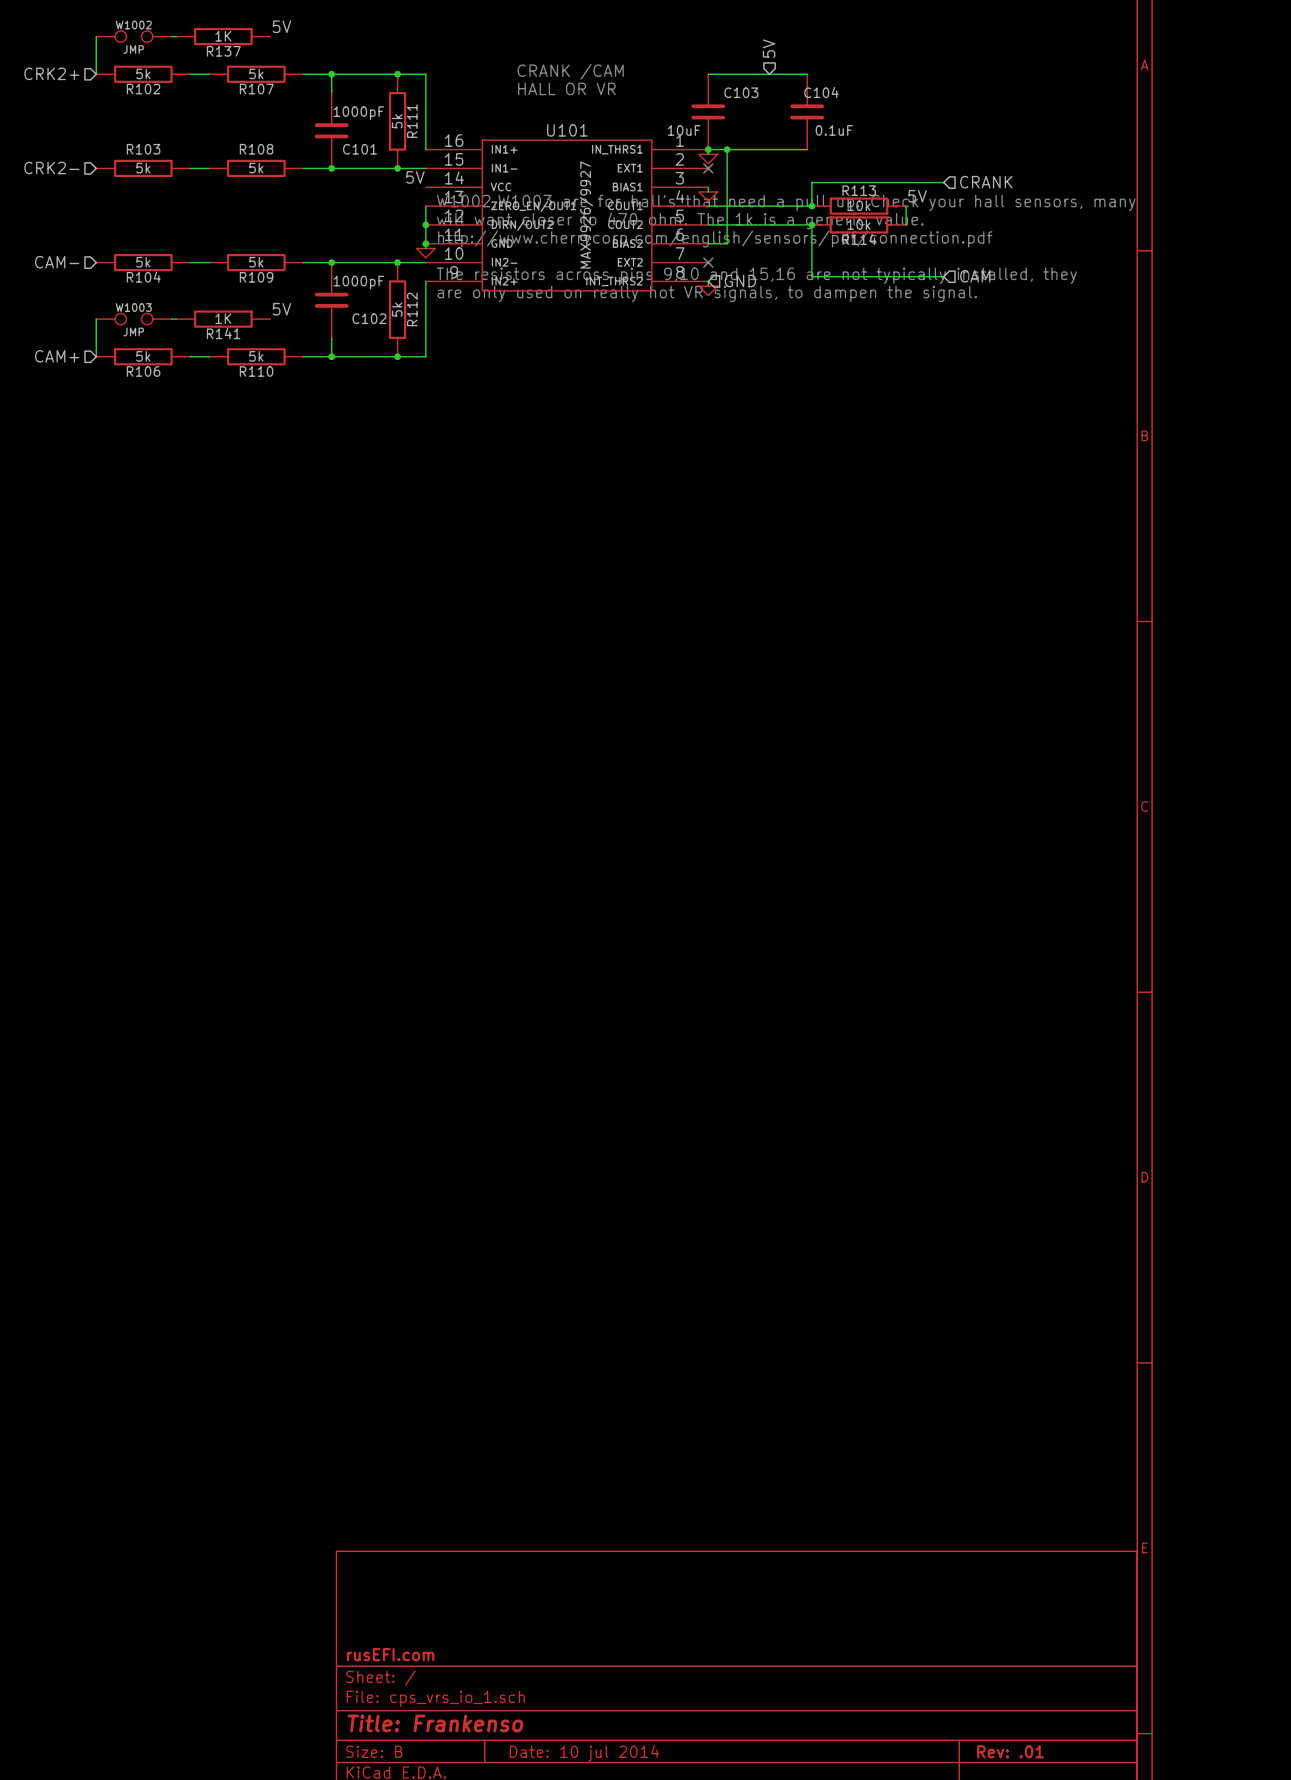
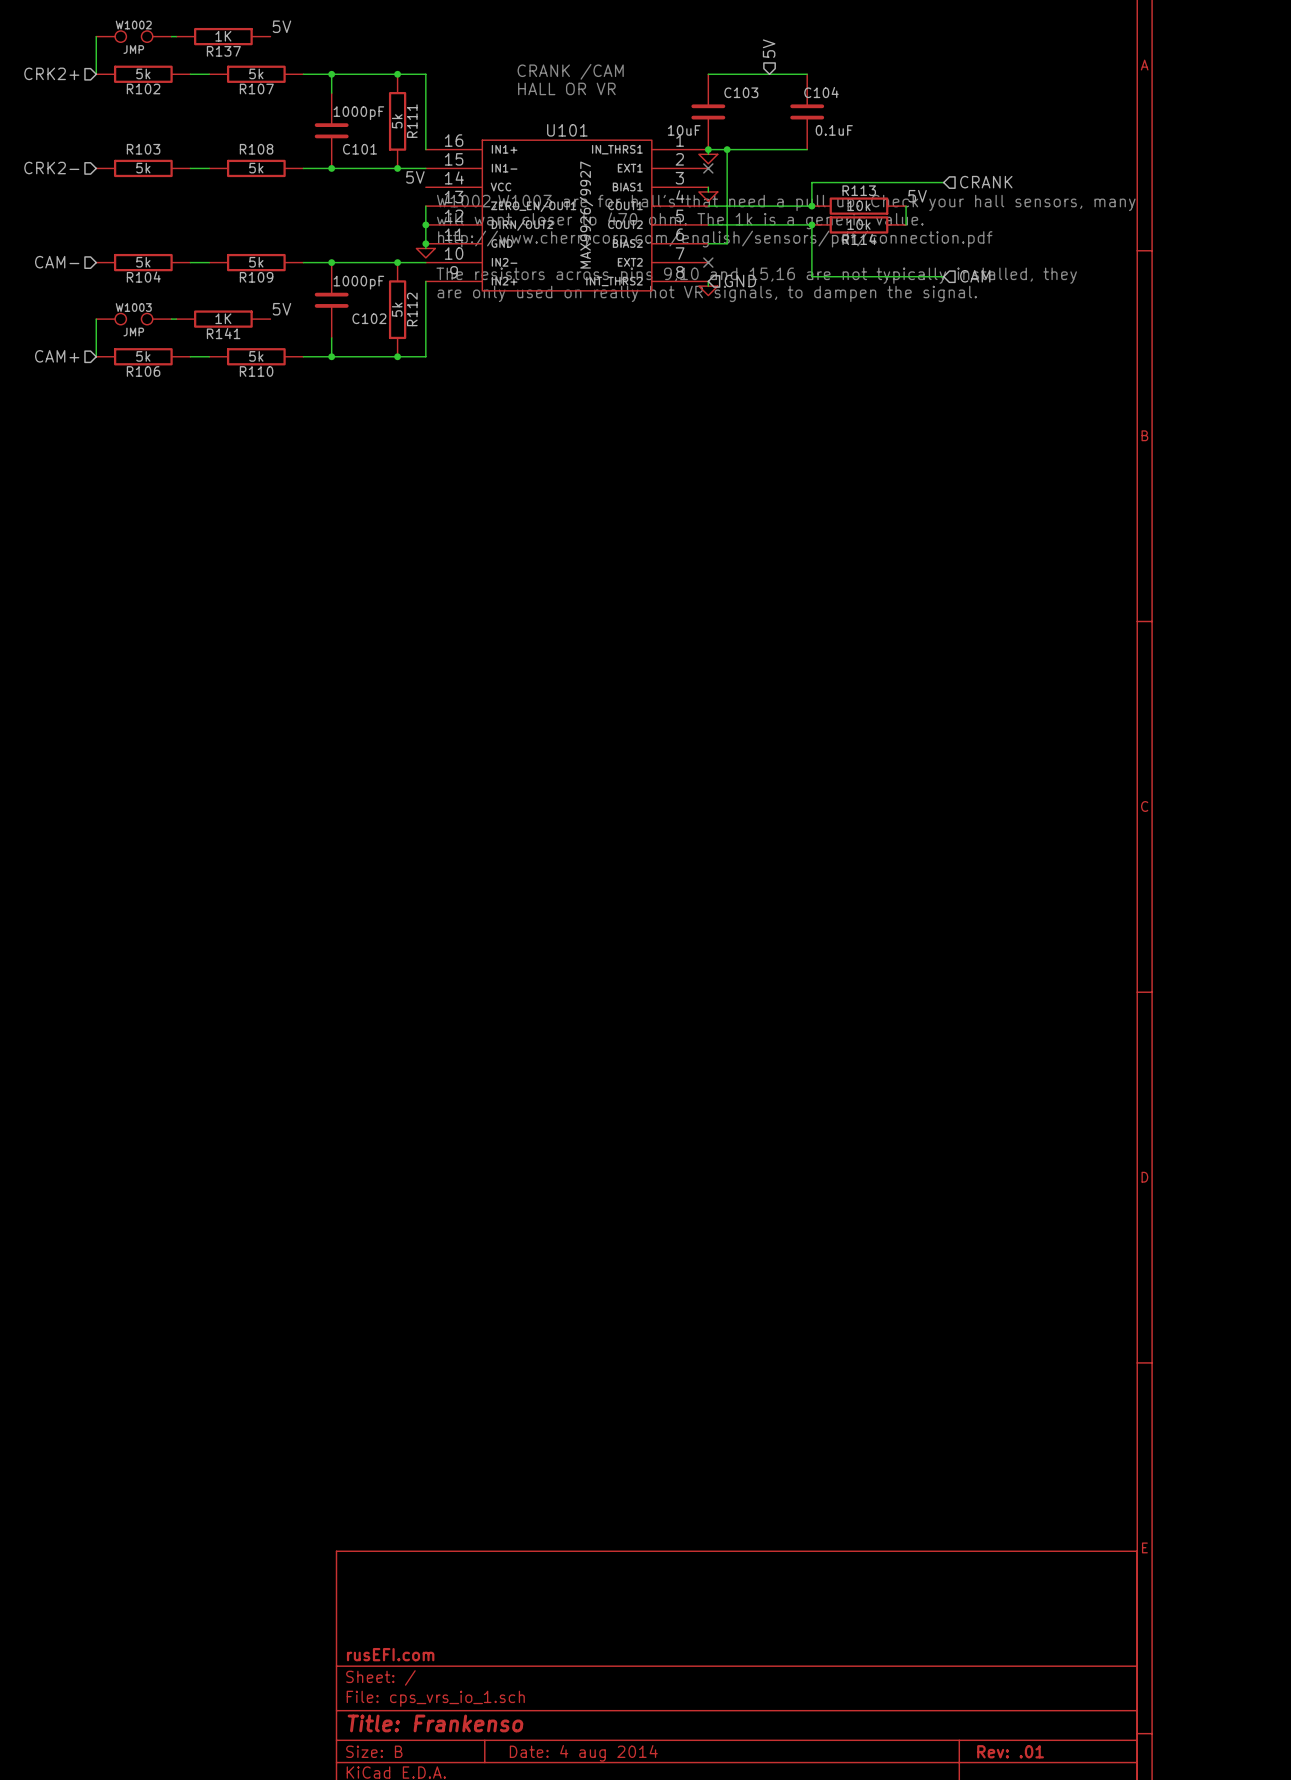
title block: Date: 10 jul 2014 (584, 1753) -> Date: 4 aug 2014 (583, 1753)

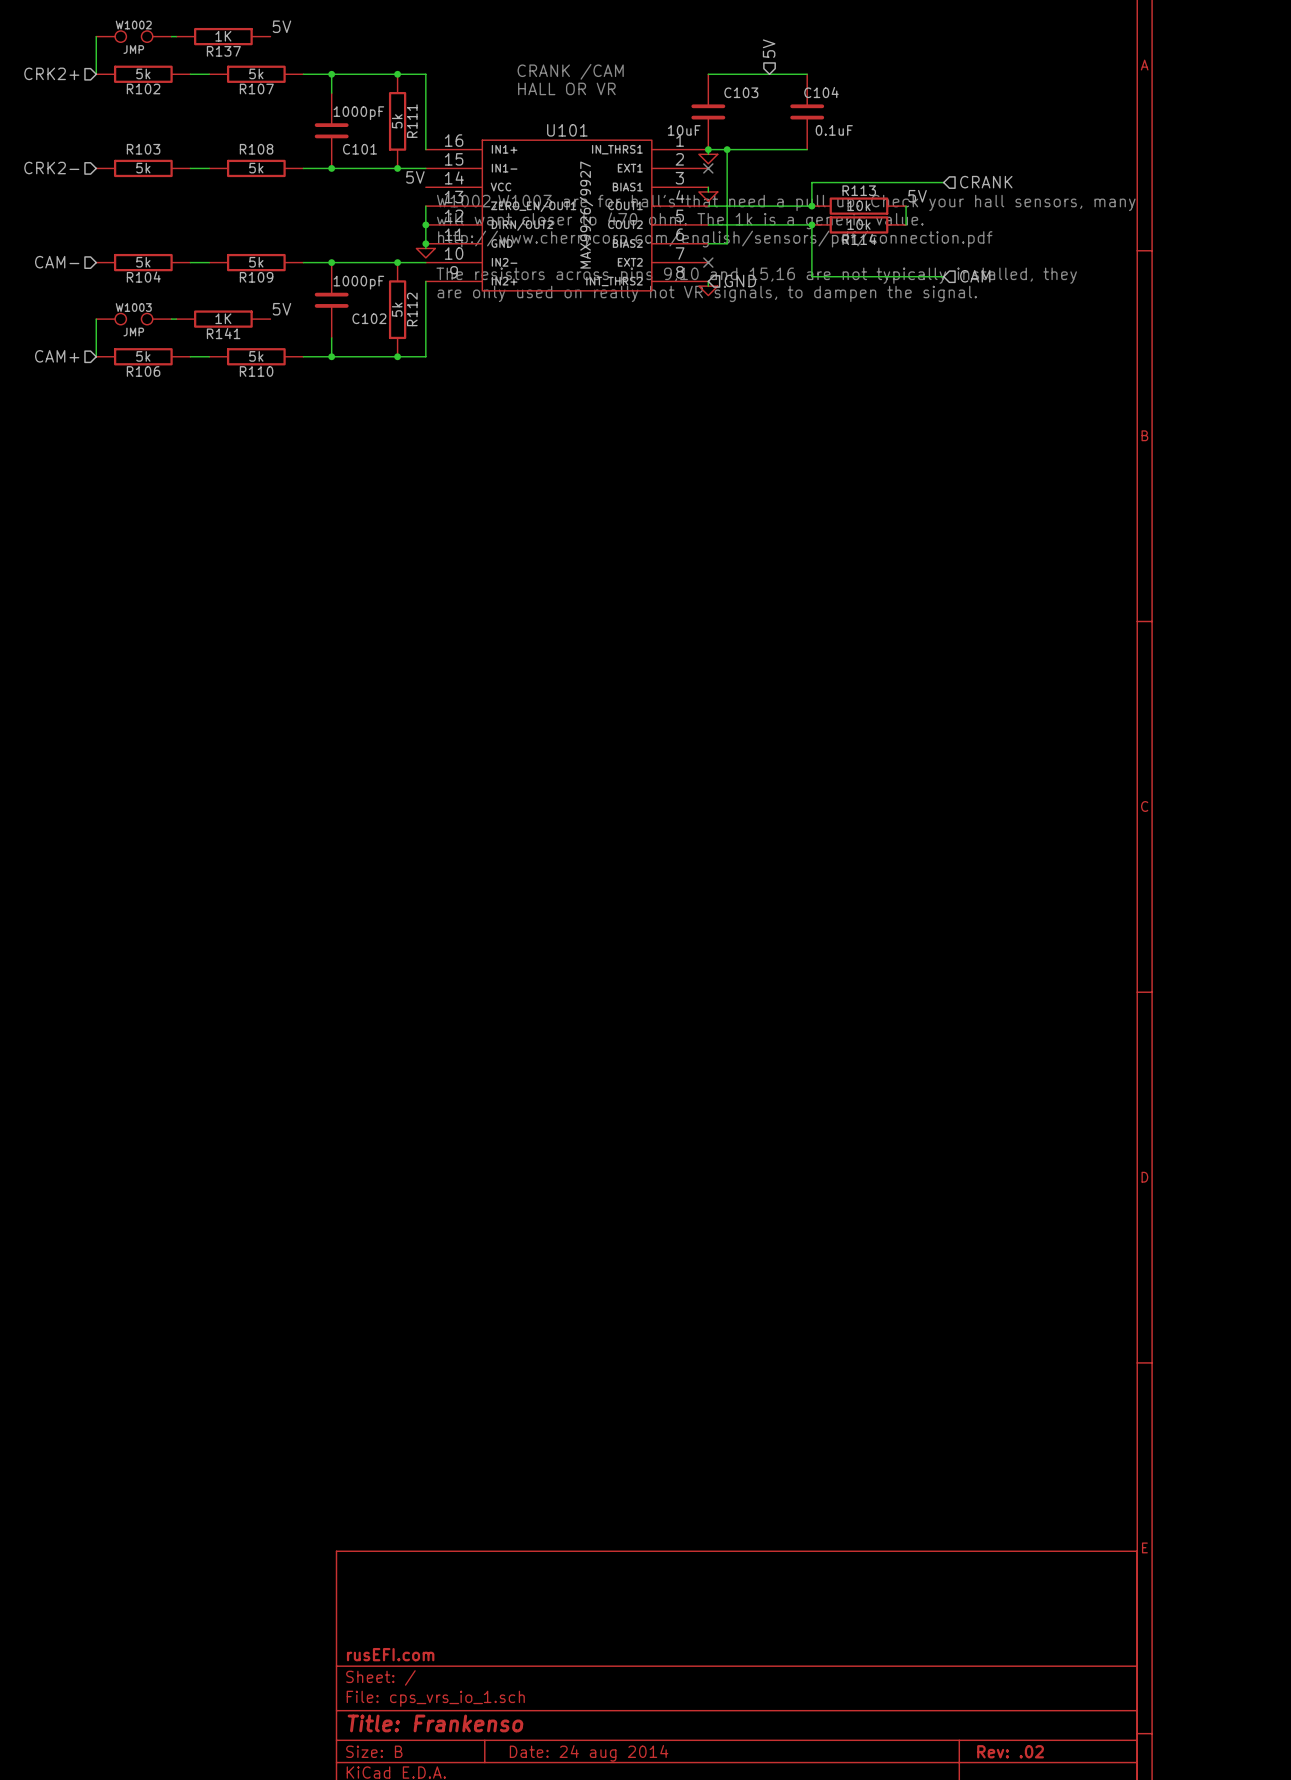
title block: Rev: .01 (1010, 1751) -> Rev: .02 (1010, 1751)
title block: Date: 4 aug 2014 (583, 1753) -> Date: 24 aug 2014 (589, 1753)

